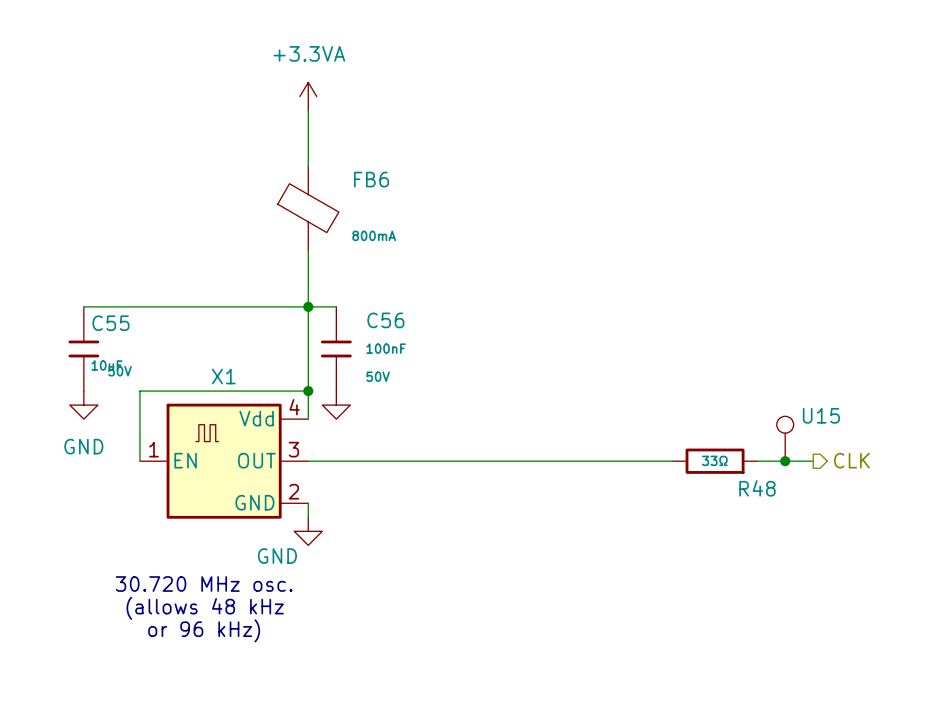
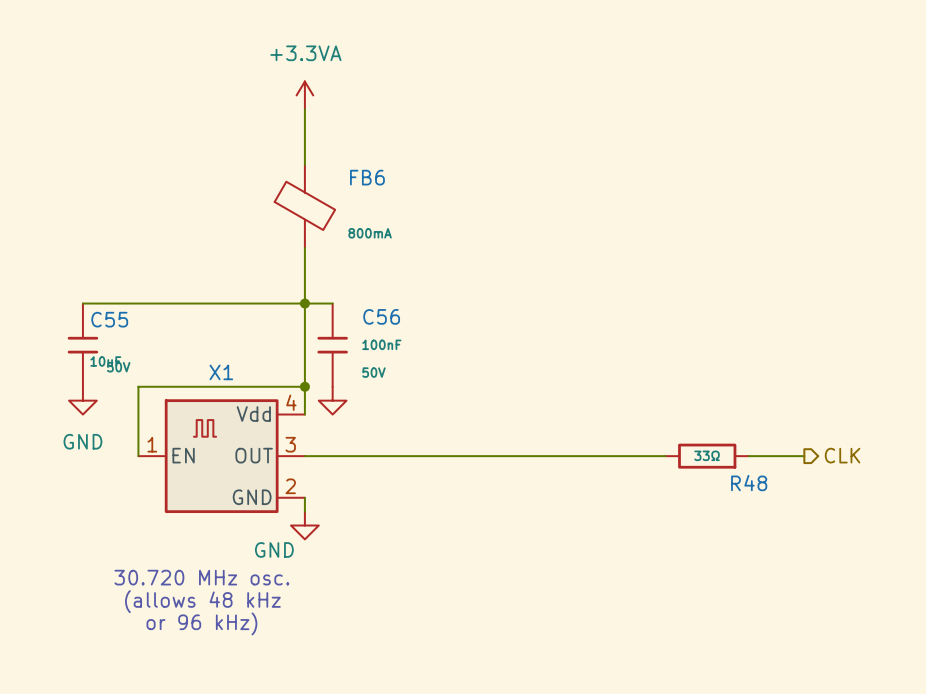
part: U15 (785, 438) -> none
junction: (785, 461) -> none

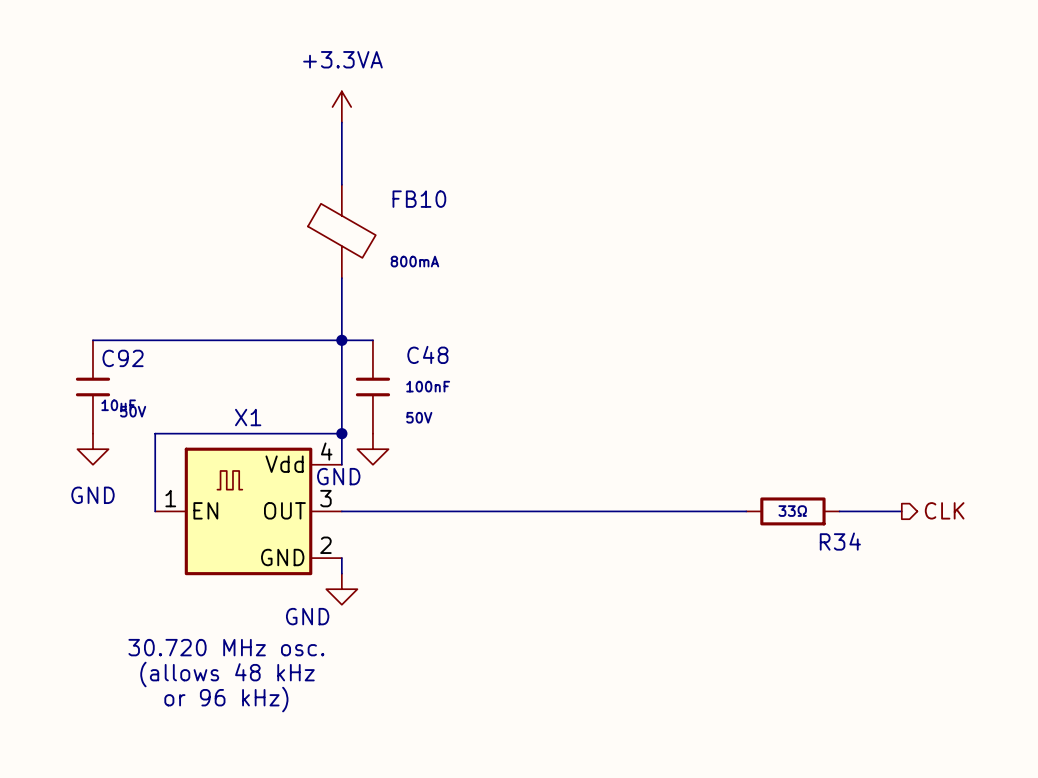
FB6 name: FB6 (367, 177) -> FB10 (419, 199)
C56 name: C56 (381, 316) -> C48 (427, 354)
C55 name: C55 (109, 319) -> C92 (123, 358)
power symbol text: none -> GND (338, 476)
R48 name: R48 (749, 483) -> R34 (840, 541)

